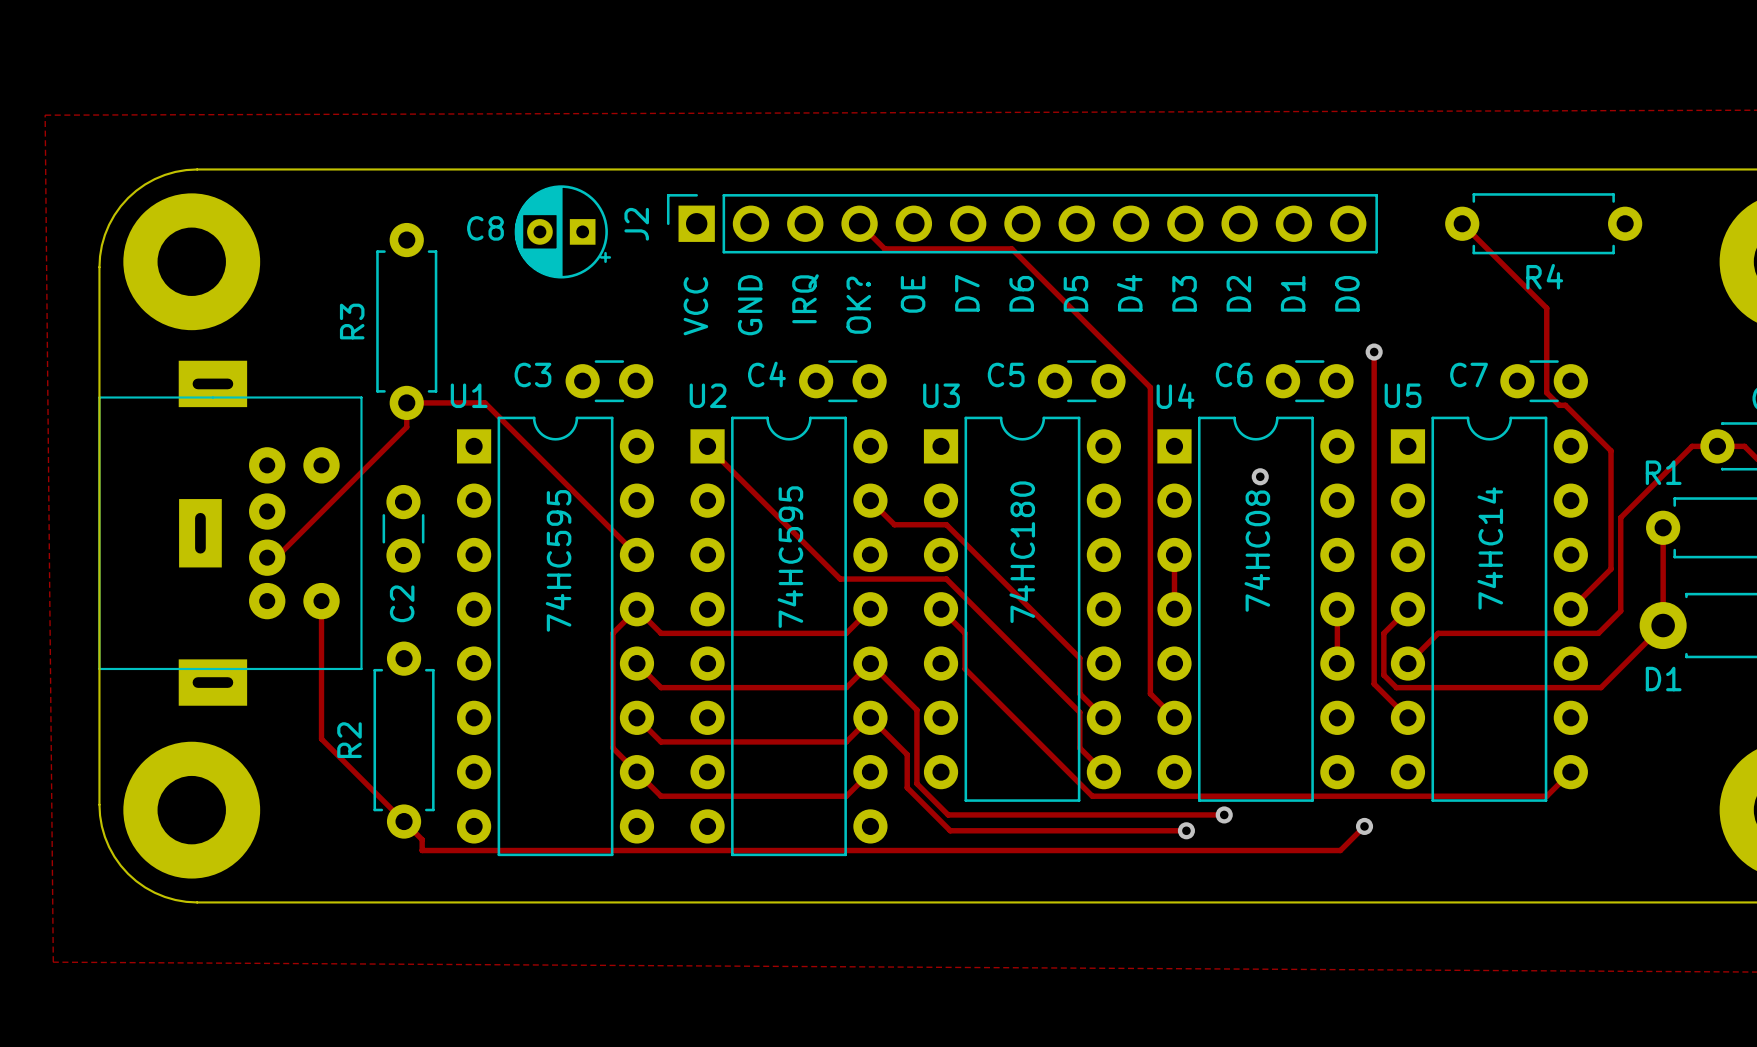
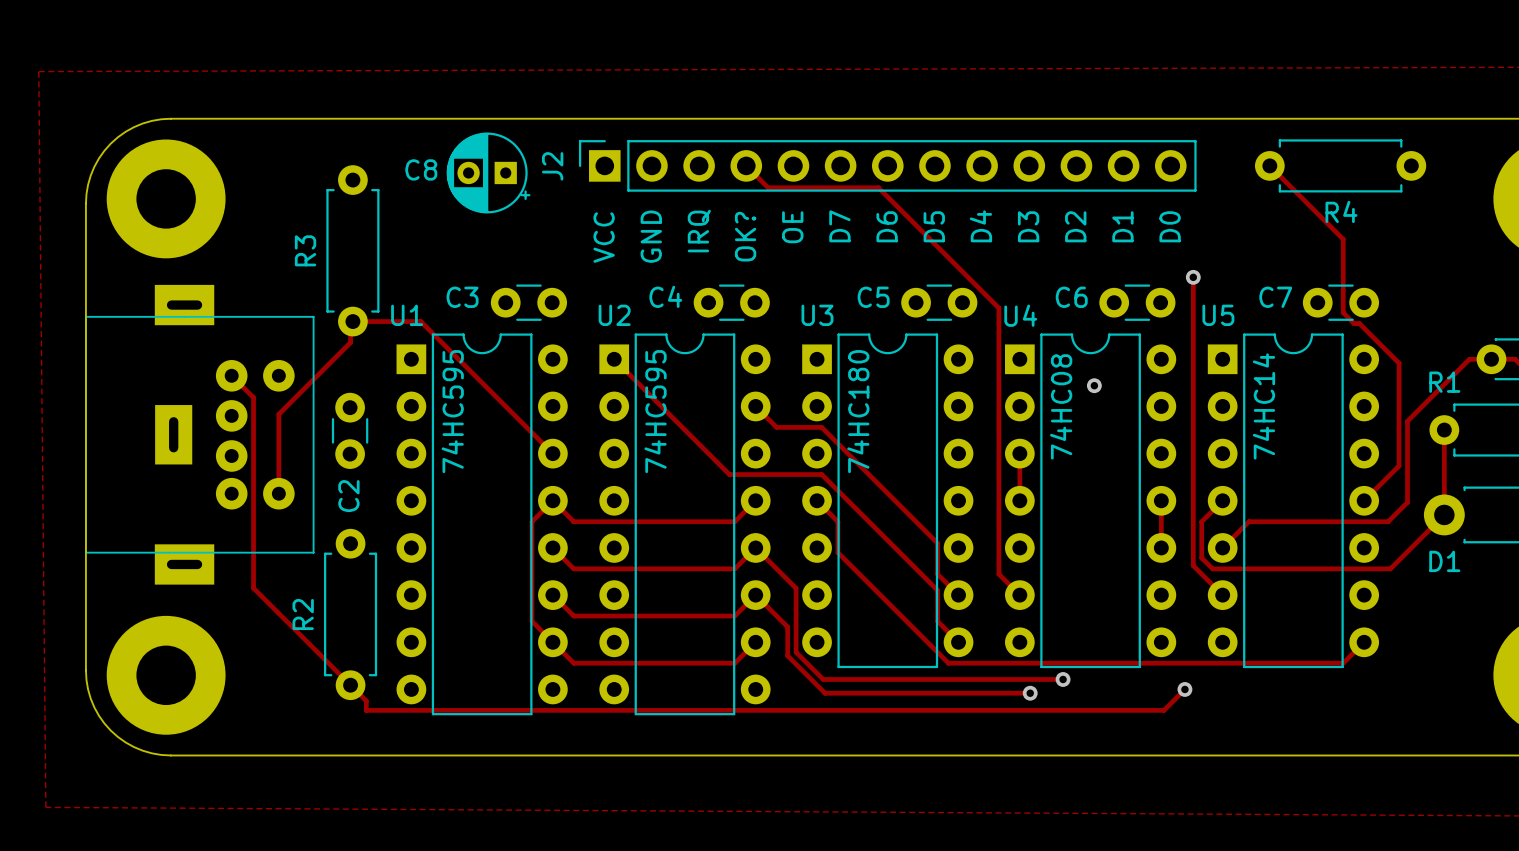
track: (406, 402) (406, 427) (276, 557) (267, 557) -> (352, 321) (350, 323) (350, 342) (278, 414) (278, 493)
text position: 74HC14 (1490, 548) -> 74HC14 (1263, 406)
text position: 74HC08 (1257, 551) -> 74HC08 (1061, 406)
text position: 74HC180 (1022, 552) -> 74HC180 (858, 411)
text position: 74HC595 (790, 557) -> 74HC595 (655, 411)
text position: 74HC595 (558, 560) -> 74HC595 (452, 411)
track: (321, 601) (321, 739) -> (231, 375) (253, 397) (253, 588) (278, 613)

